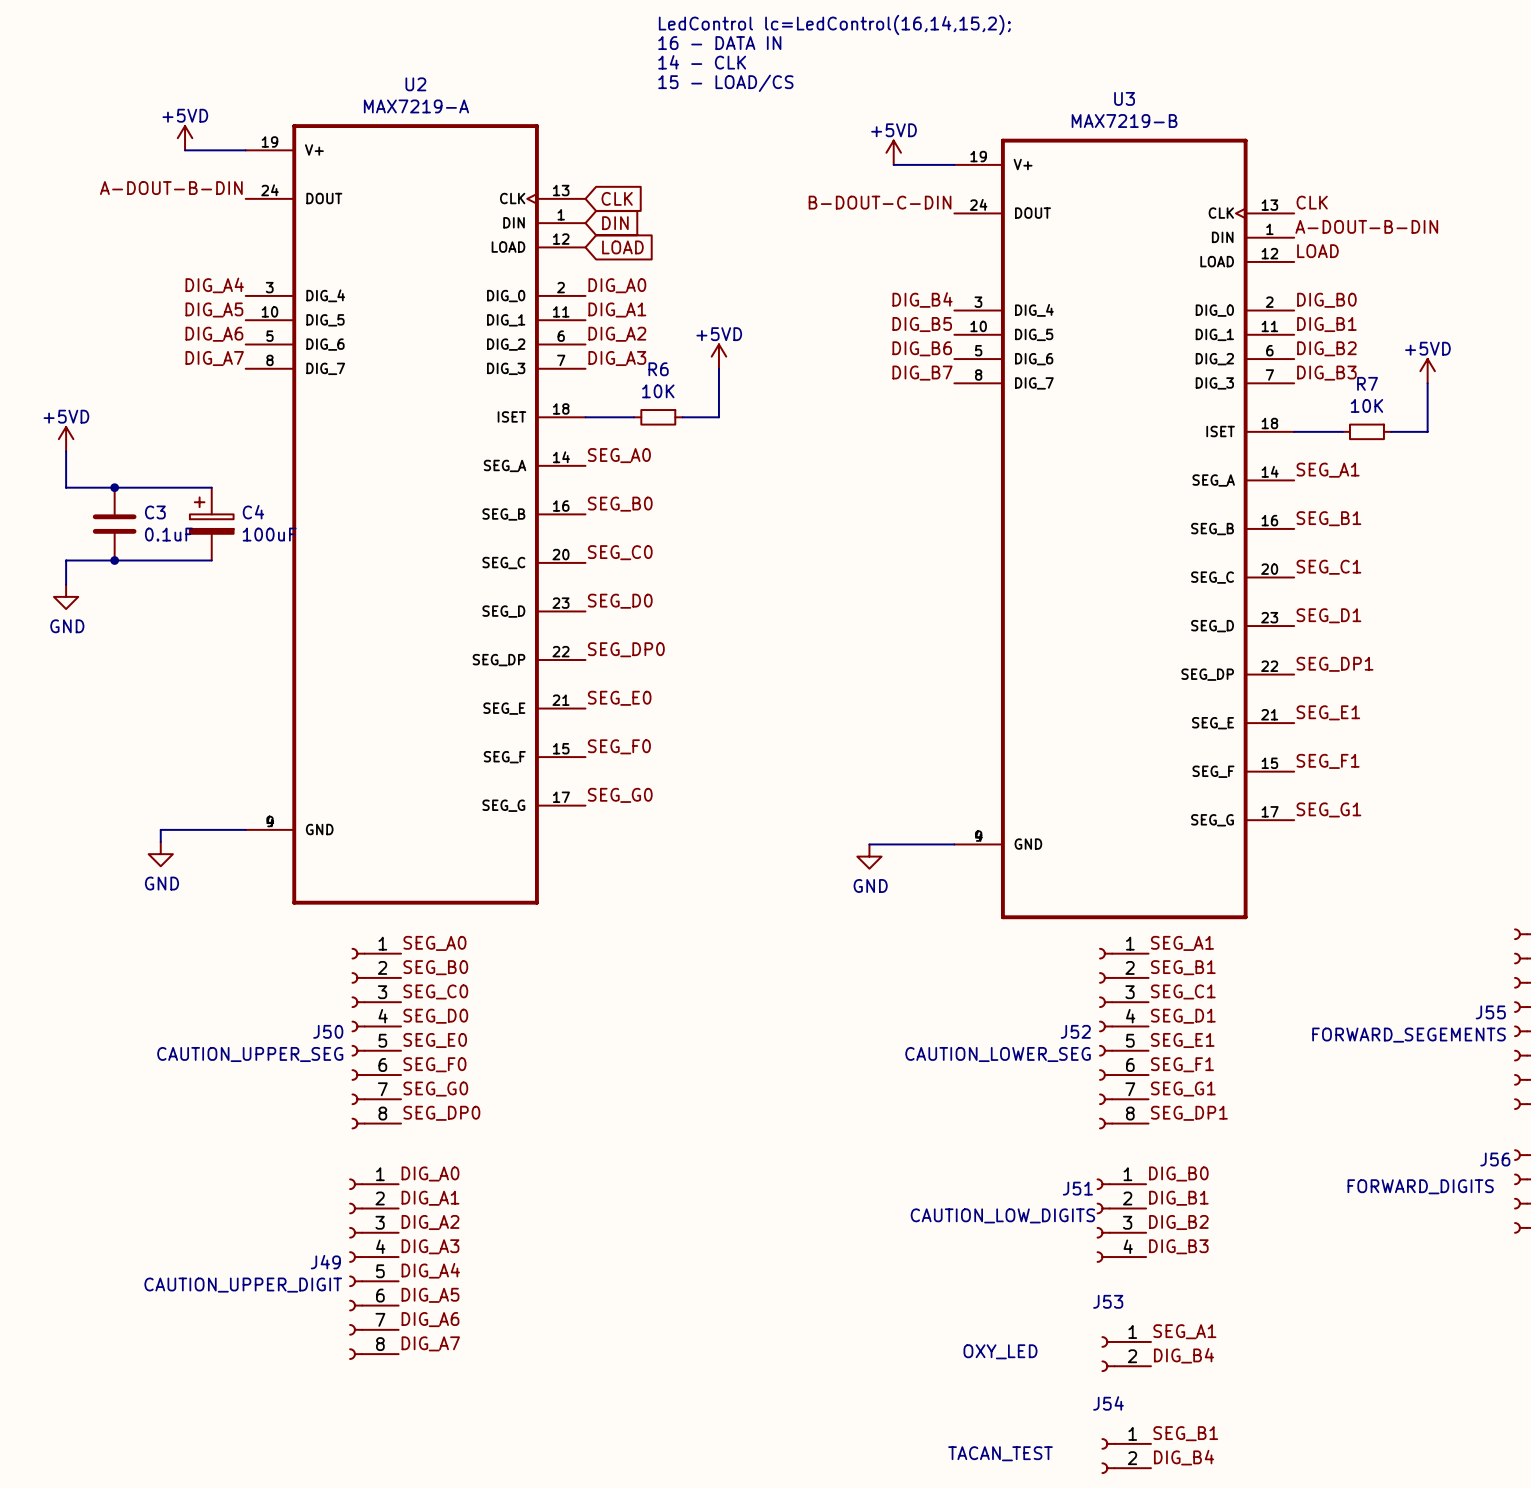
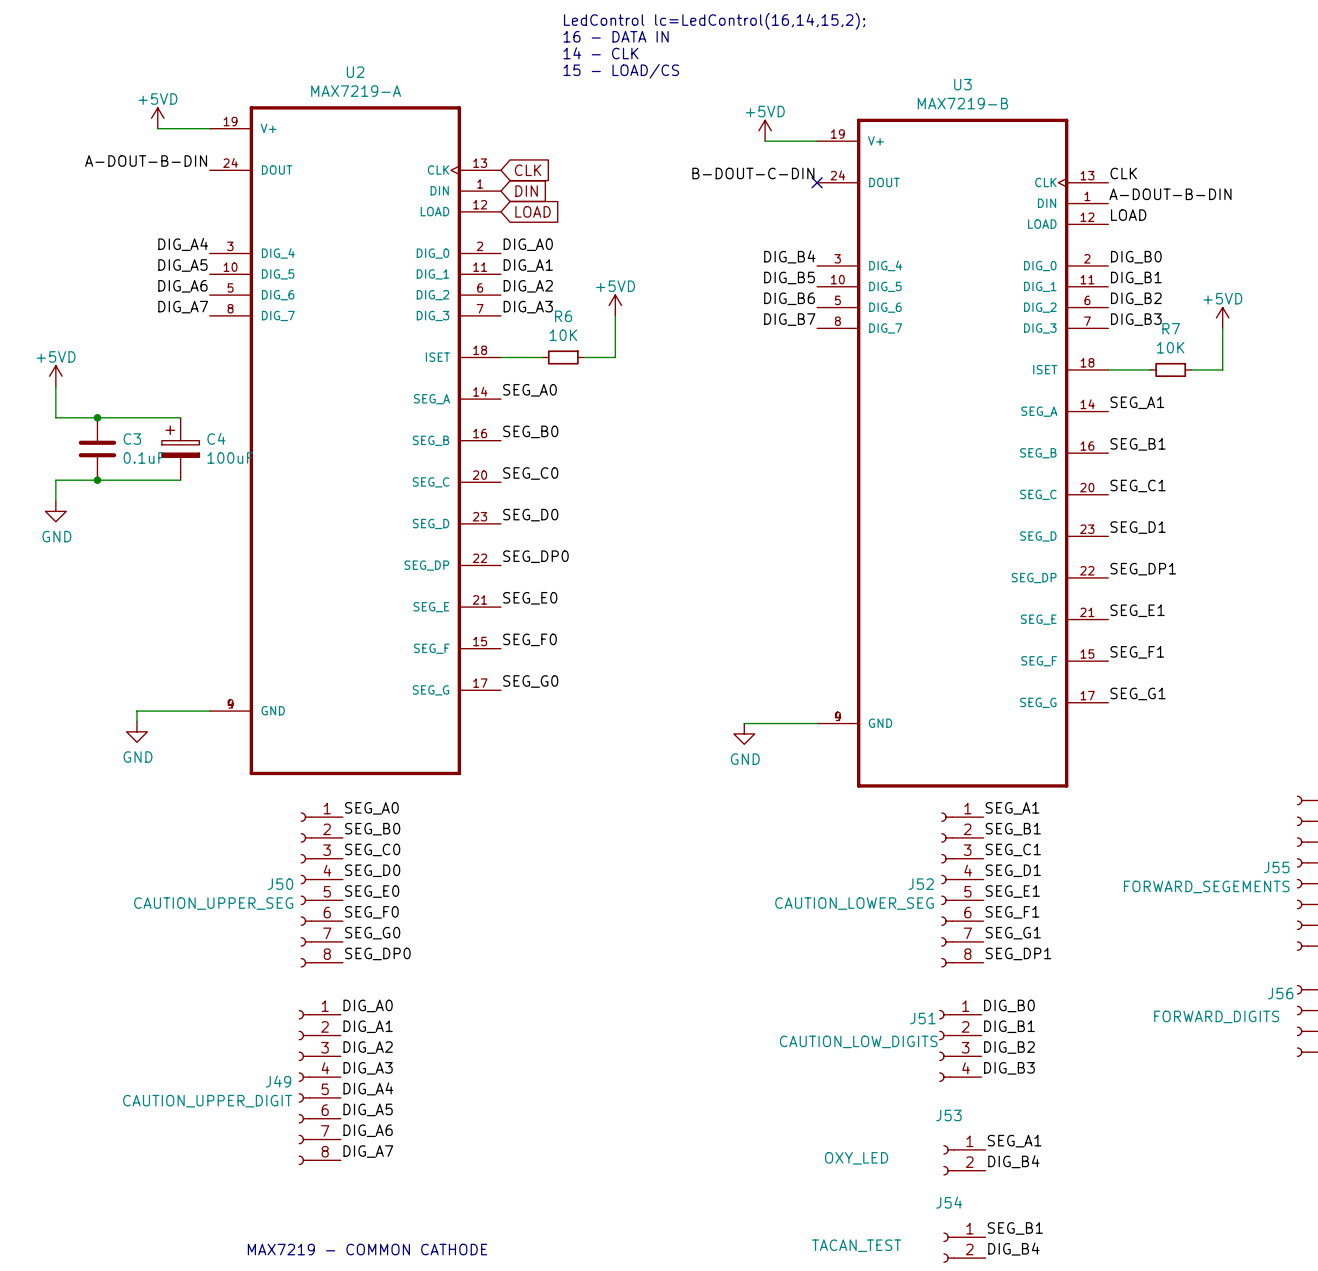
no-connect mark: none -> (817, 182)
text: none -> MAX7219 - COMMON CATHODE (367, 1249)

